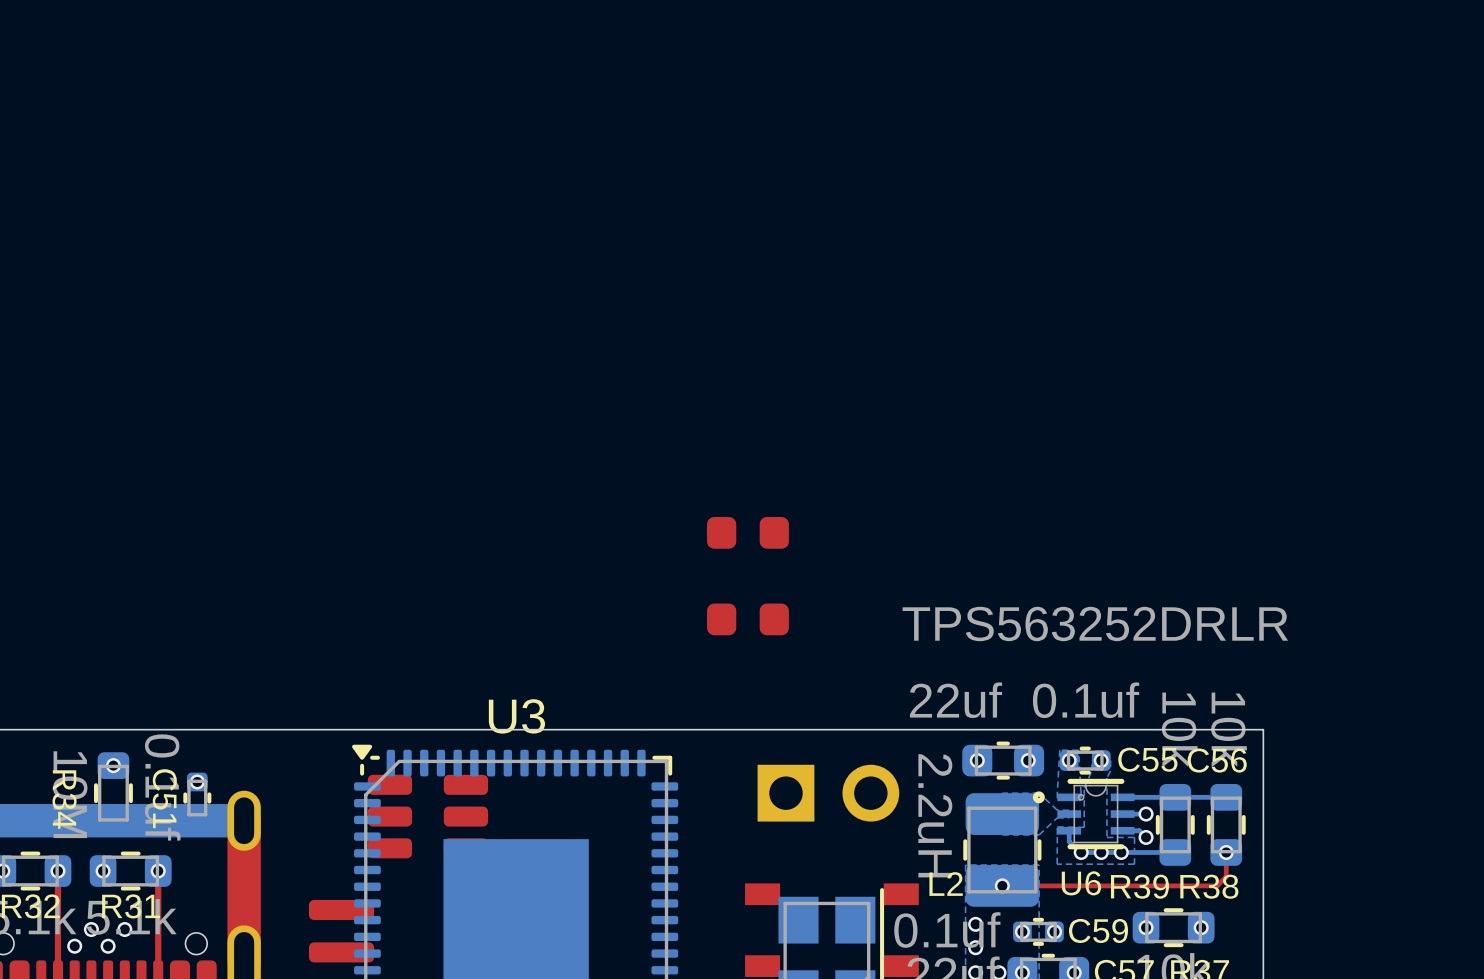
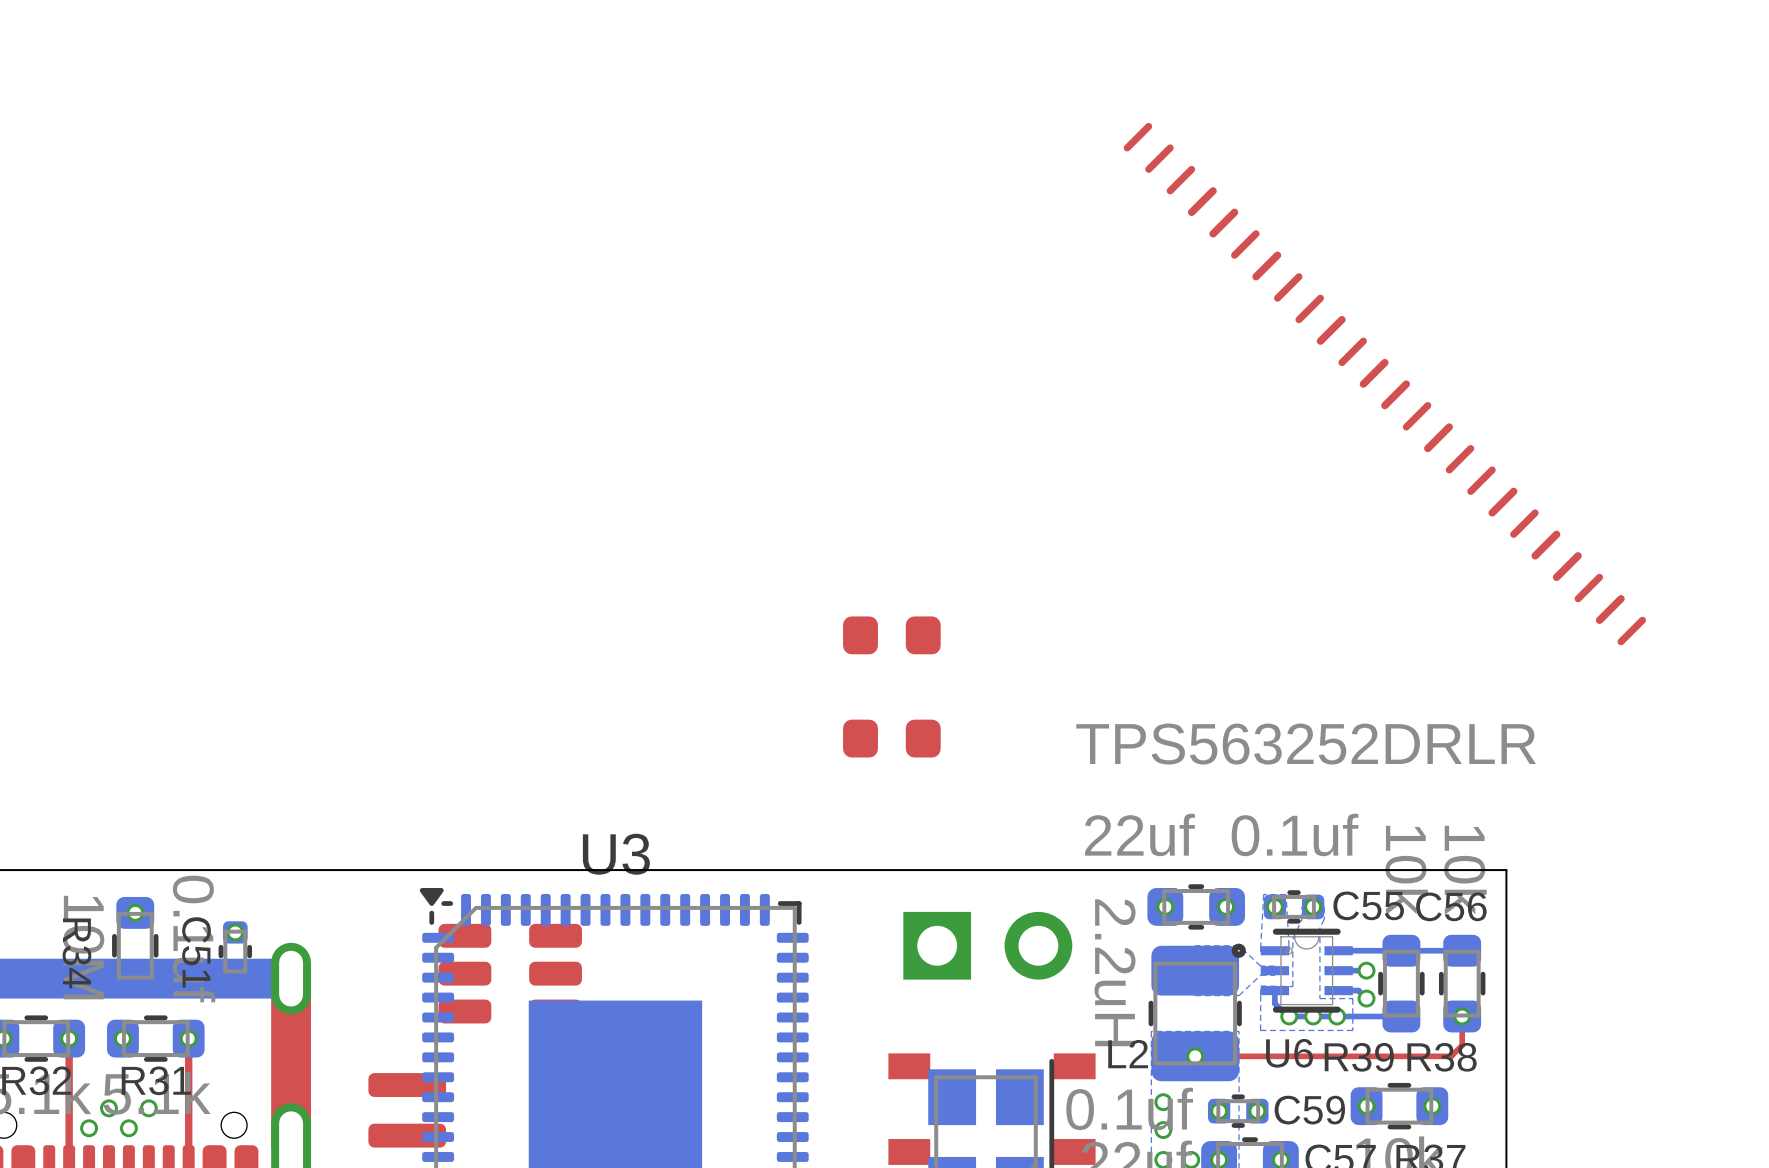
top track: none -> (1148, 126) (1127, 147)
top track: none -> (1170, 147) (1148, 169)
top track: none -> (1191, 169) (1170, 190)
top track: none -> (1213, 190) (1191, 212)
top track: none -> (1234, 212) (1213, 233)
top track: none -> (1256, 233) (1234, 255)
top track: none -> (1277, 255) (1256, 276)
top track: none -> (1298, 276) (1277, 298)
top track: none -> (1320, 298) (1298, 319)
top track: none -> (1341, 319) (1320, 341)
top track: none -> (1363, 341) (1341, 362)
top track: none -> (1384, 362) (1363, 384)
top track: none -> (1406, 384) (1384, 405)
top track: none -> (1427, 405) (1406, 427)
top track: none -> (1449, 427) (1427, 448)
top track: none -> (1470, 448) (1449, 469)
top track: none -> (1492, 469) (1470, 491)
top track: none -> (1513, 491) (1492, 512)
top track: none -> (1535, 512) (1513, 534)
top track: none -> (1556, 534) (1535, 555)
top track: none -> (1578, 555) (1556, 577)
top track: none -> (1599, 577) (1578, 598)
top track: none -> (1621, 598) (1599, 620)
top track: none -> (1642, 620) (1621, 641)

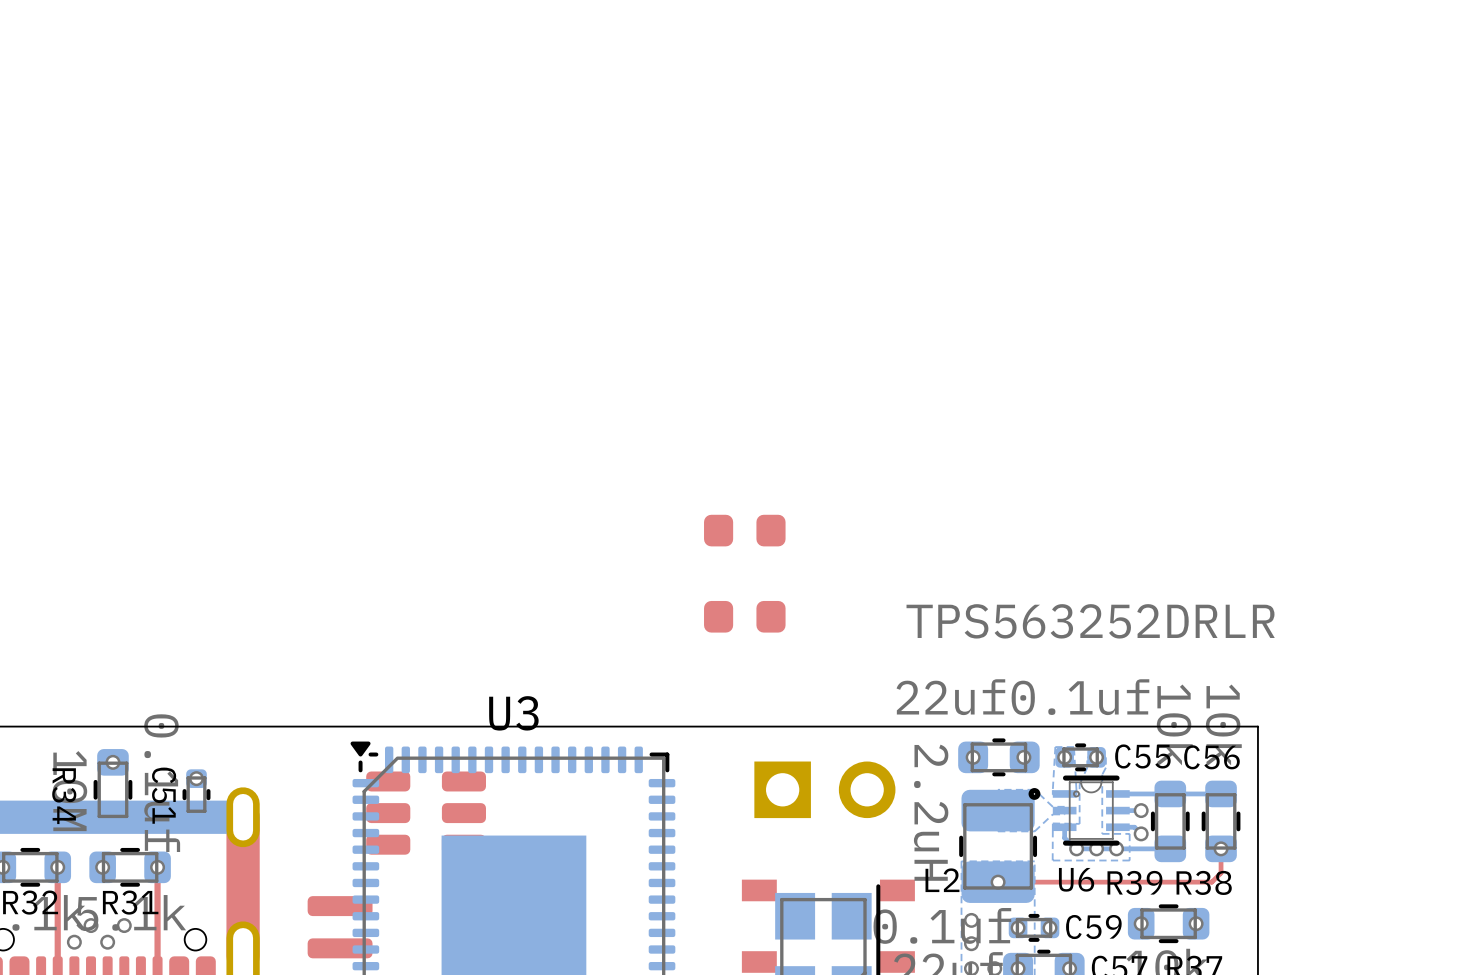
top track: (1148, 126) (1127, 147) -> none
top track: (1170, 147) (1148, 169) -> none
top track: (1191, 169) (1170, 190) -> none
top track: (1213, 190) (1191, 212) -> none
top track: (1234, 212) (1213, 233) -> none
top track: (1256, 233) (1234, 255) -> none
top track: (1277, 255) (1256, 276) -> none
top track: (1298, 276) (1277, 298) -> none
top track: (1320, 298) (1298, 319) -> none
top track: (1341, 319) (1320, 341) -> none
top track: (1363, 341) (1341, 362) -> none
top track: (1384, 362) (1363, 384) -> none
top track: (1406, 384) (1384, 405) -> none
top track: (1427, 405) (1406, 427) -> none
top track: (1449, 427) (1427, 448) -> none
top track: (1470, 448) (1449, 469) -> none
top track: (1492, 469) (1470, 491) -> none
top track: (1513, 491) (1492, 512) -> none
top track: (1535, 512) (1513, 534) -> none
top track: (1556, 534) (1535, 555) -> none
top track: (1578, 555) (1556, 577) -> none
top track: (1599, 577) (1578, 598) -> none
top track: (1621, 598) (1599, 620) -> none
top track: (1642, 620) (1621, 641) -> none

